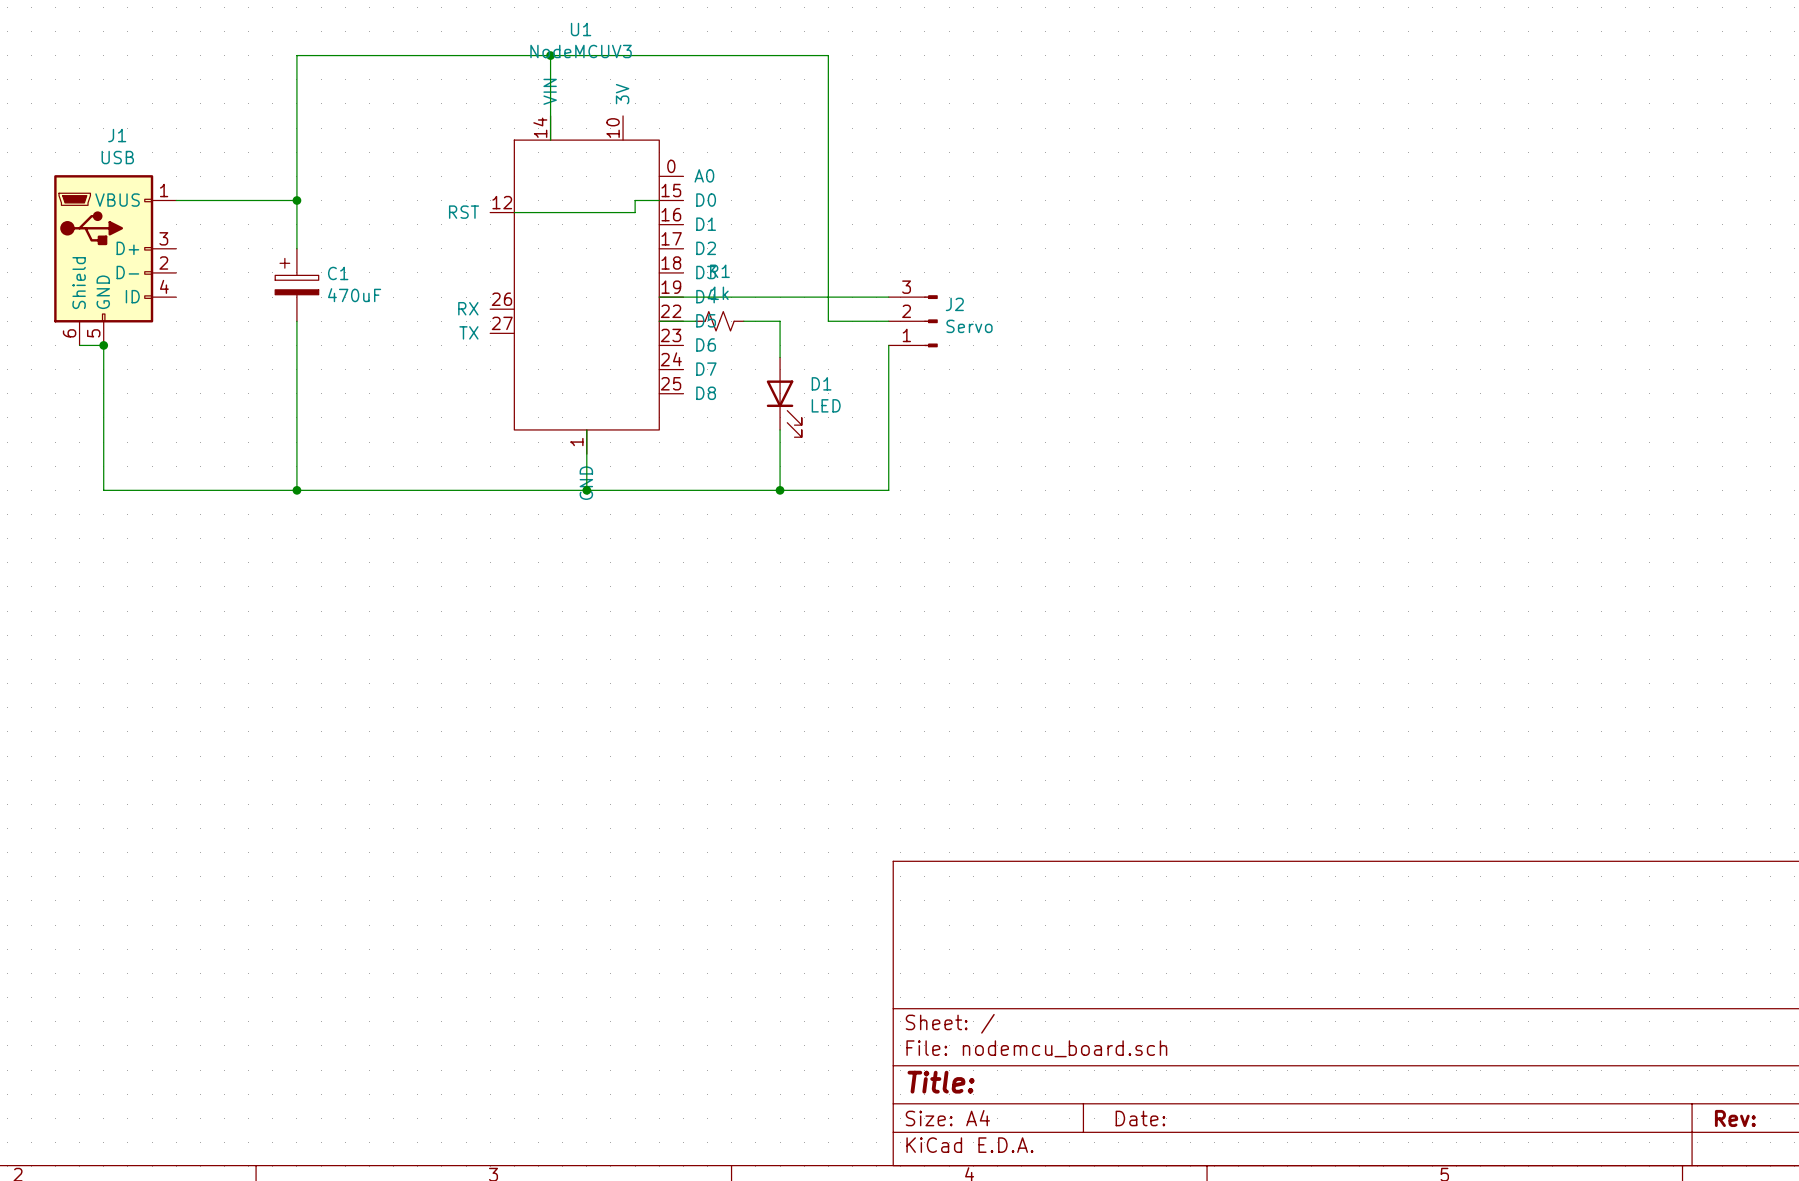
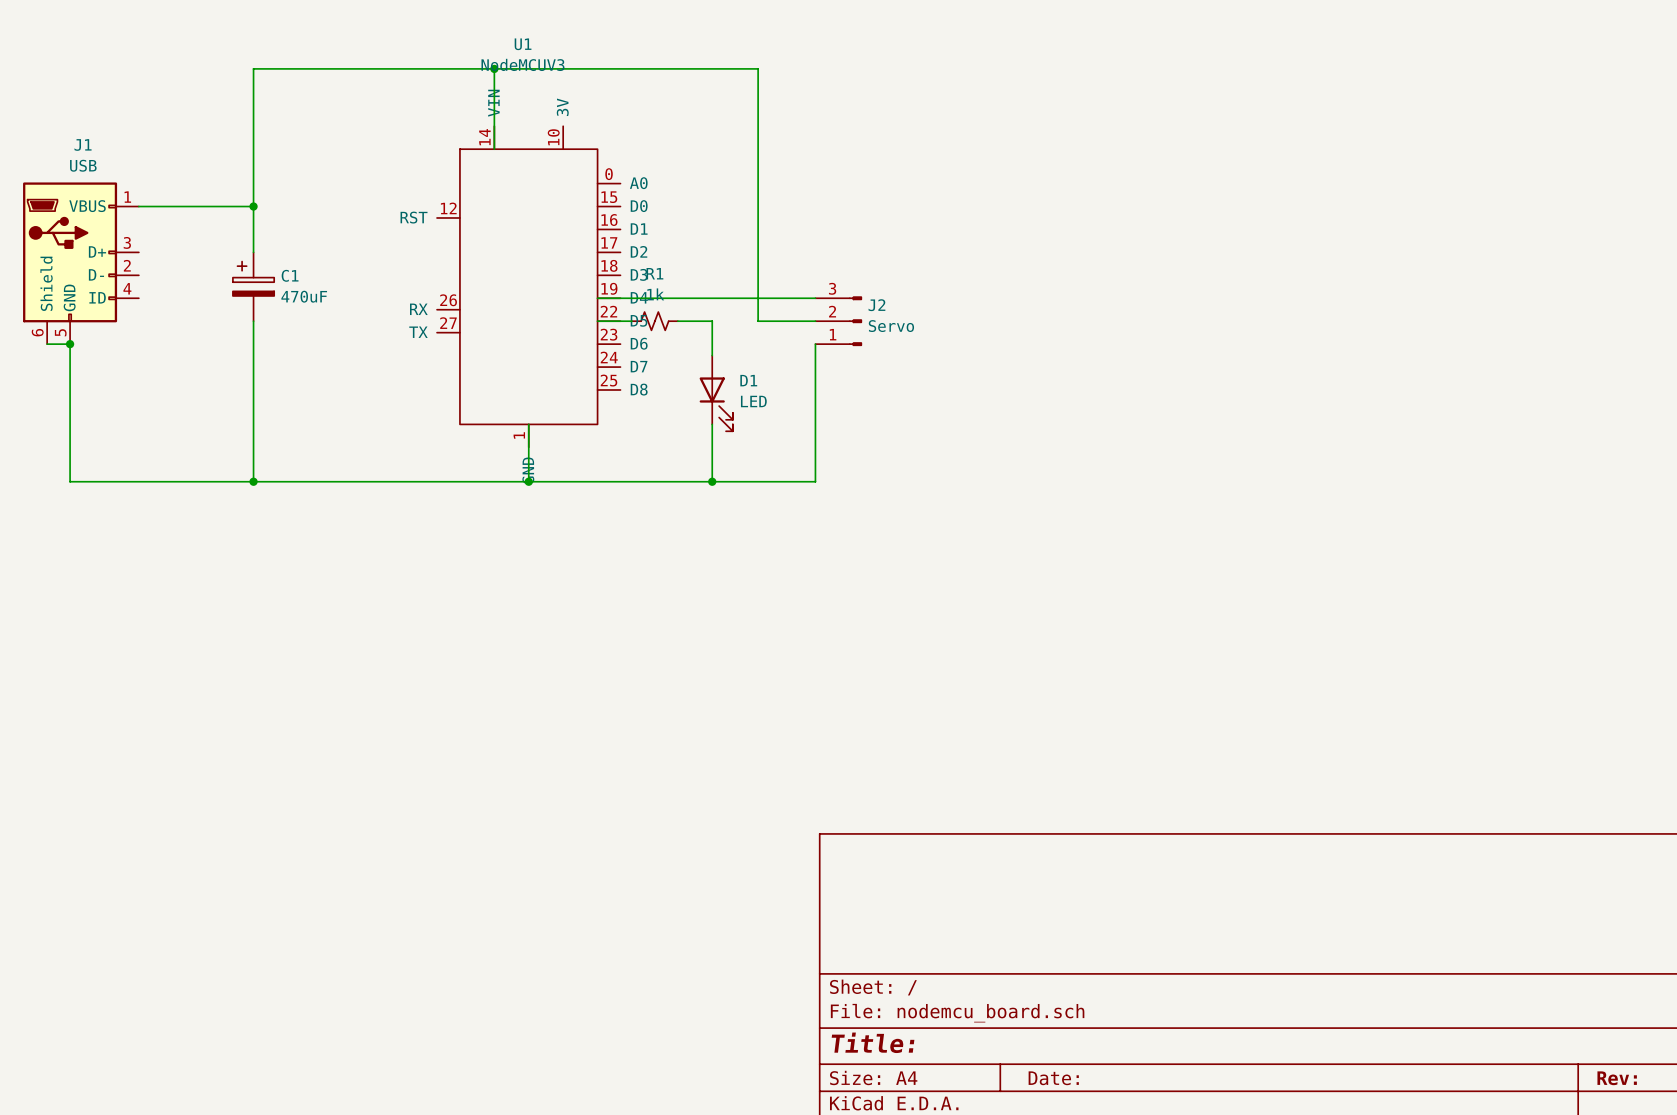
wire: (659, 200) (635, 200) (635, 212) (514, 212) -> none

